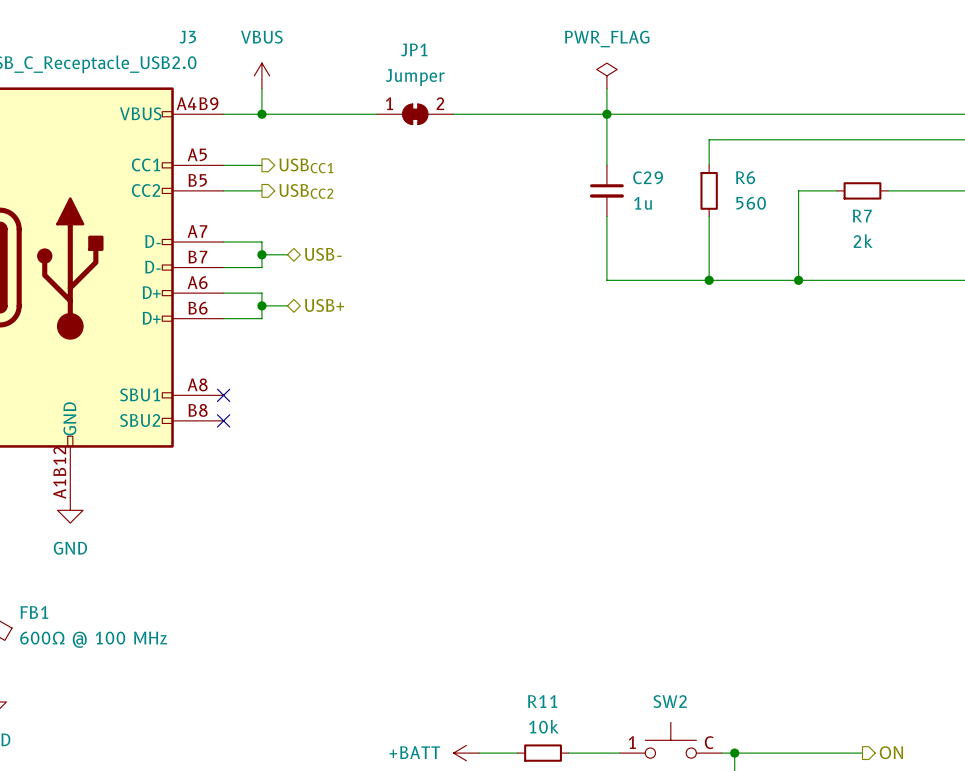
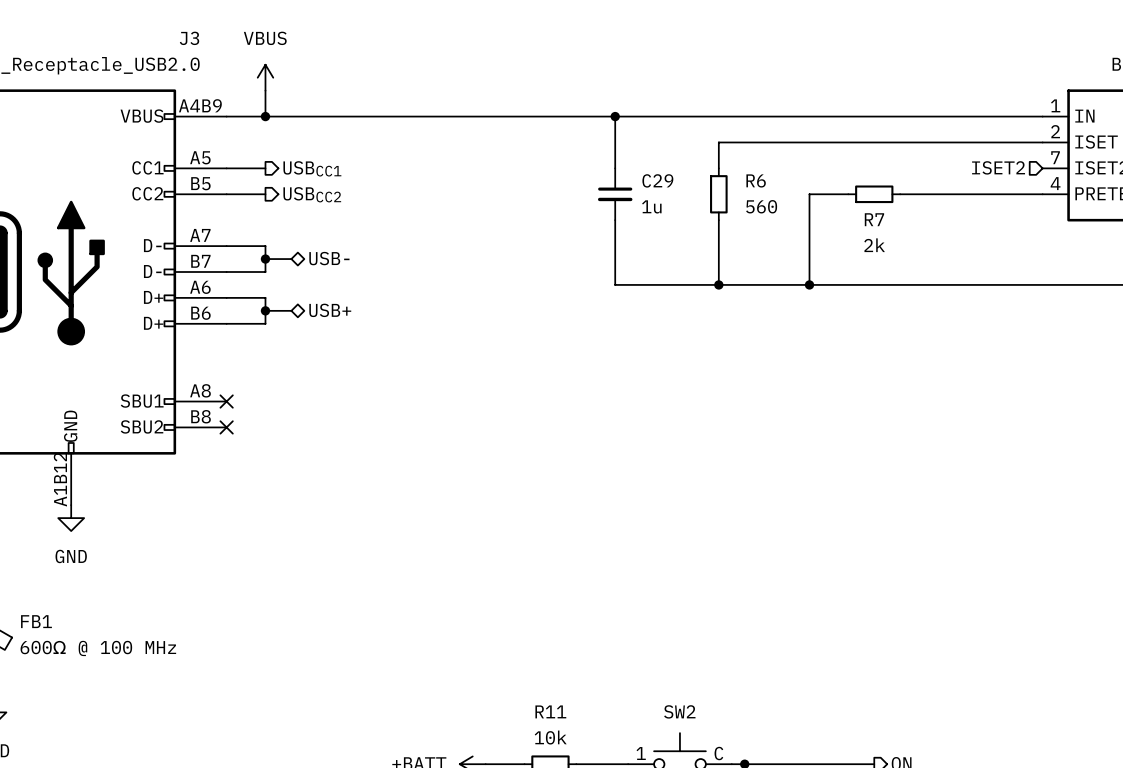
power symbol: PWR_FLAG (606, 75) -> none
wire: (606, 88) (606, 114) -> none
JP1: Jumper (415, 114) -> none

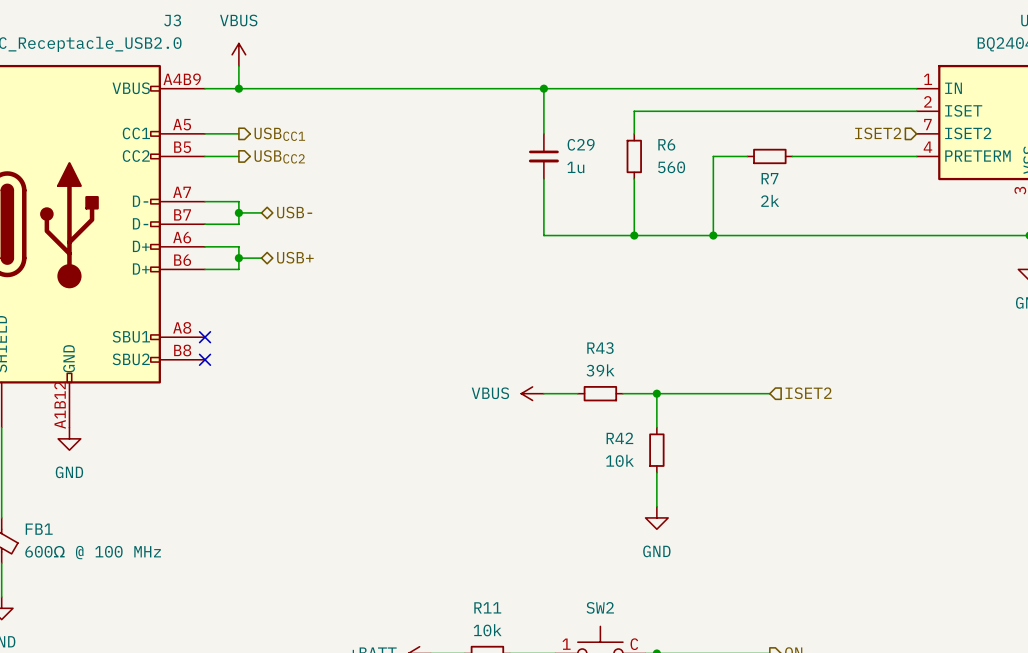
hierarchical label: none -> ISET2 (808, 393)
power symbol: none -> VBUS (532, 393)
wire: none -> (543, 393) (577, 393)
R43: none -> 39k (600, 393)
wire: none -> (622, 393) (769, 393)
wire: none -> (656, 393) (656, 427)
junction: none -> (656, 393)
R42: none -> 10k (656, 450)
wire: none -> (656, 472) (656, 506)
power symbol: none -> GND (656, 517)

